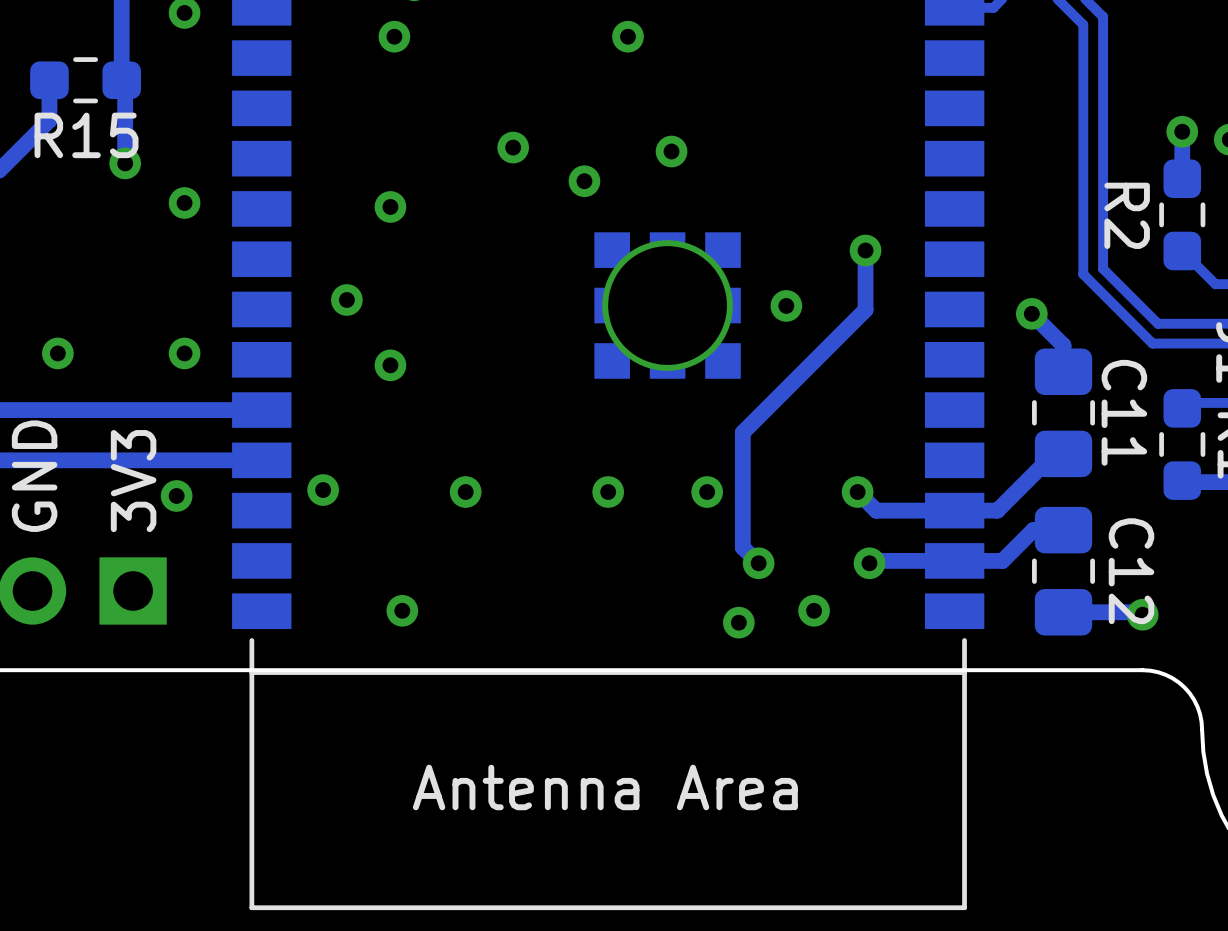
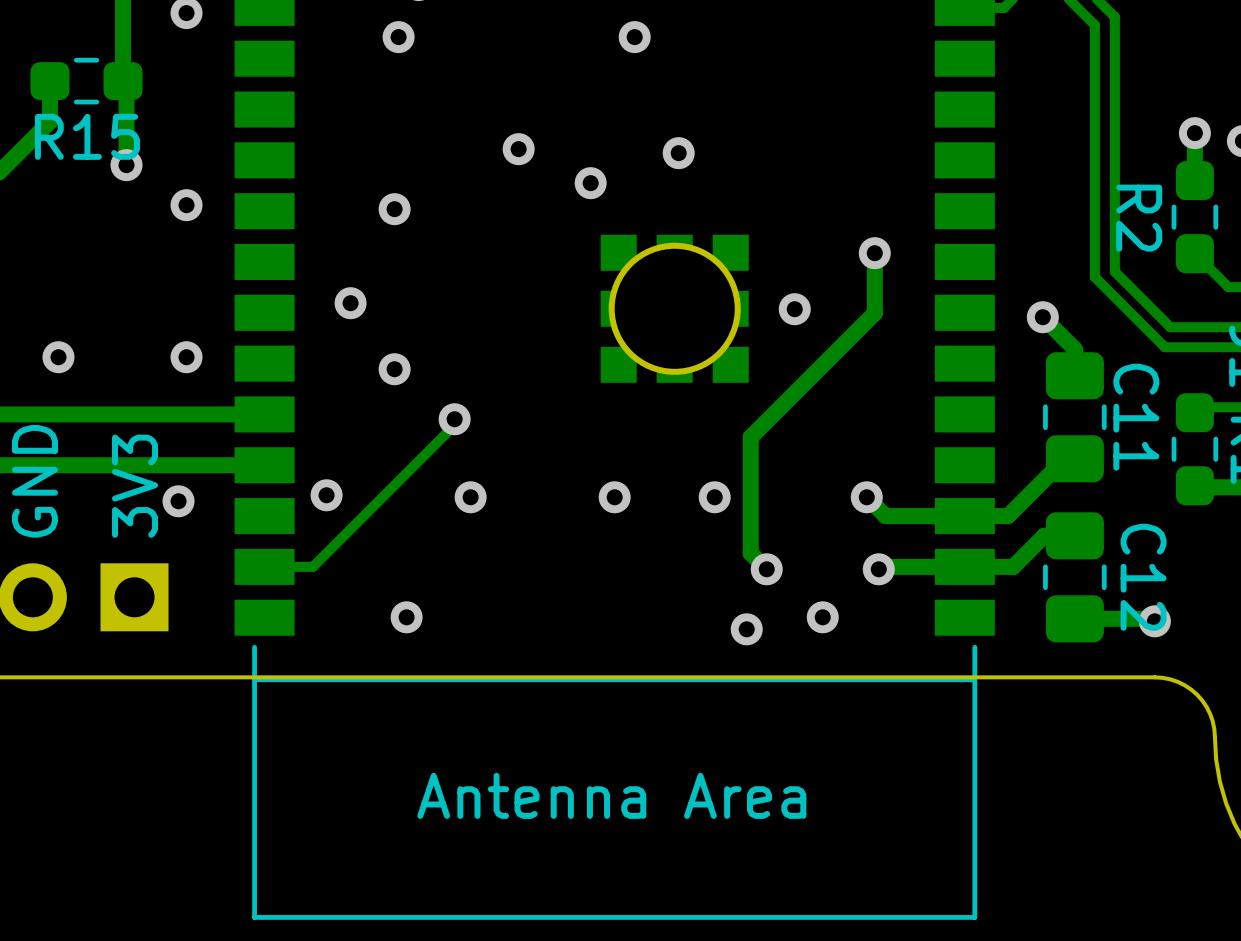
track: none -> (454, 419) (454, 425) (312, 566) (264, 566)
via: none -> (454, 419)

